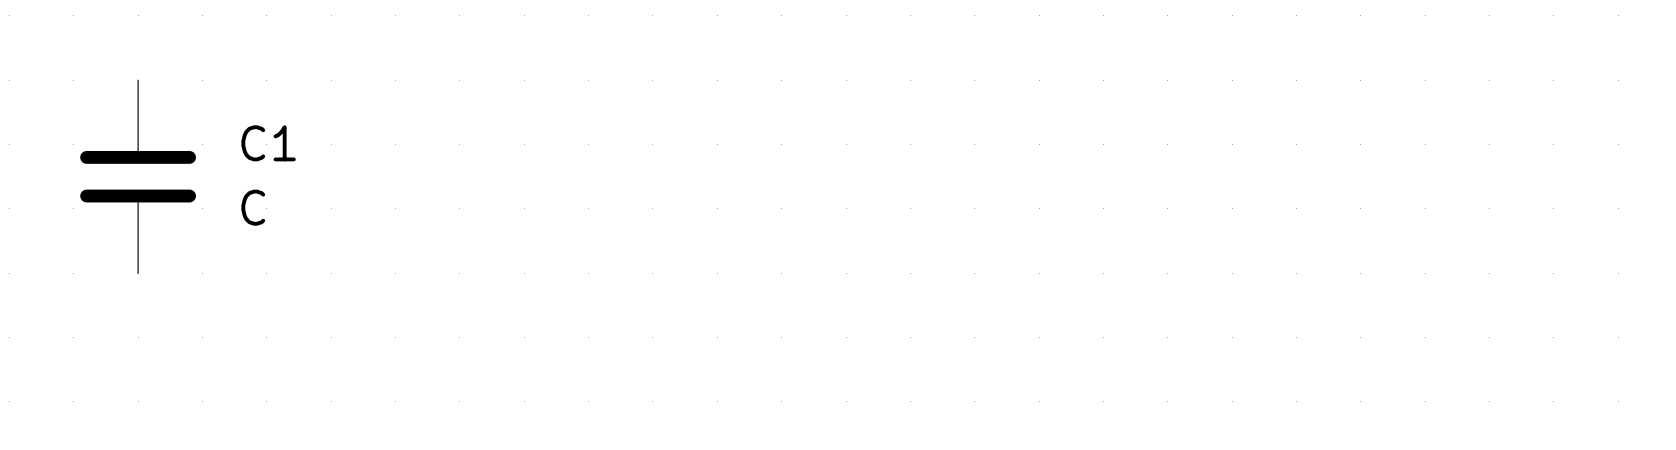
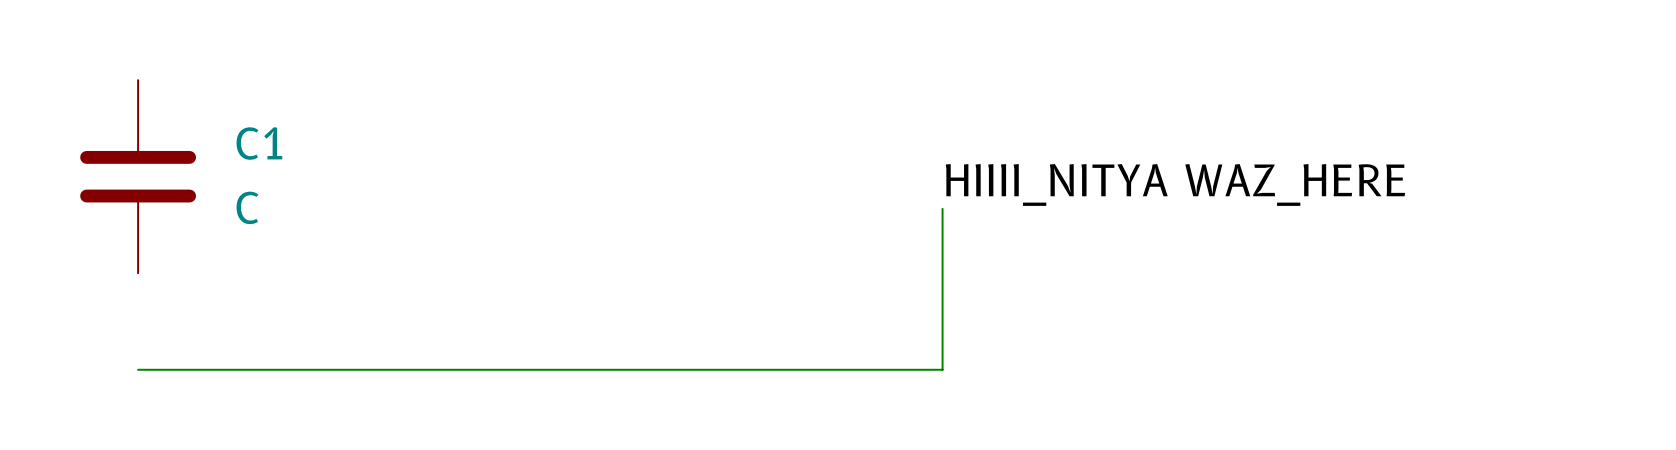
label: none -> HIIII_NITYA WAZ_HERE (1175, 184)
wire: none -> (942, 208) (942, 369) (138, 369)

